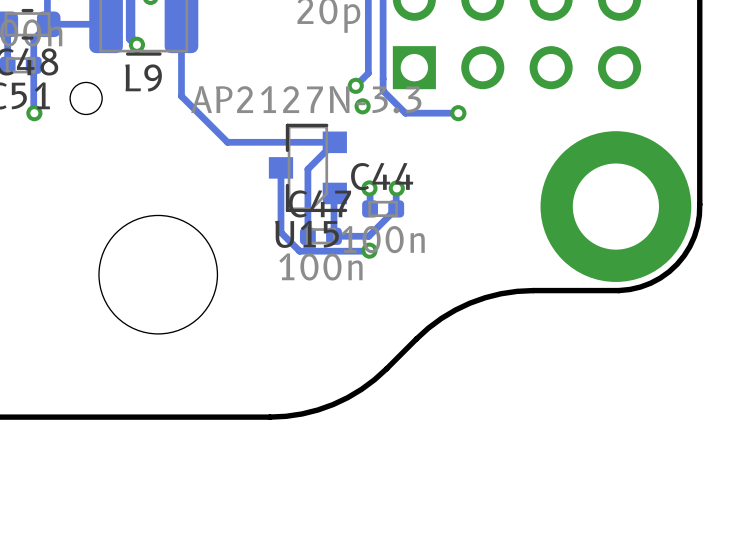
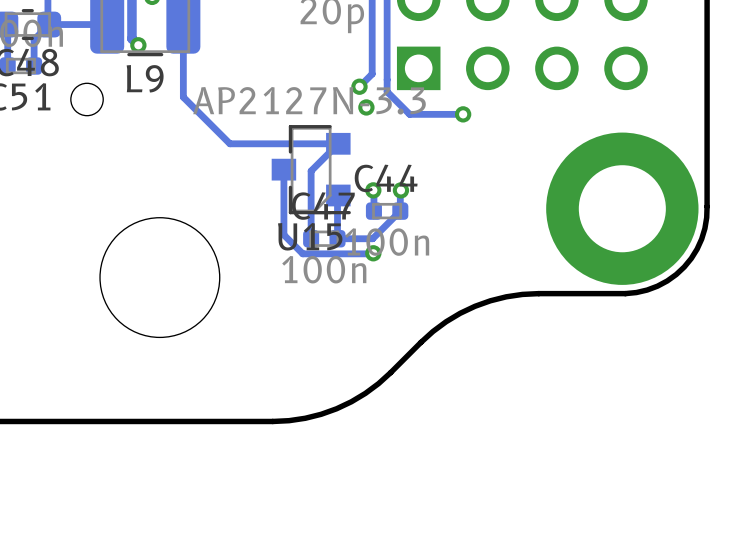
track: (33, 65) (34, 113) -> none
via: (34, 113) -> none

